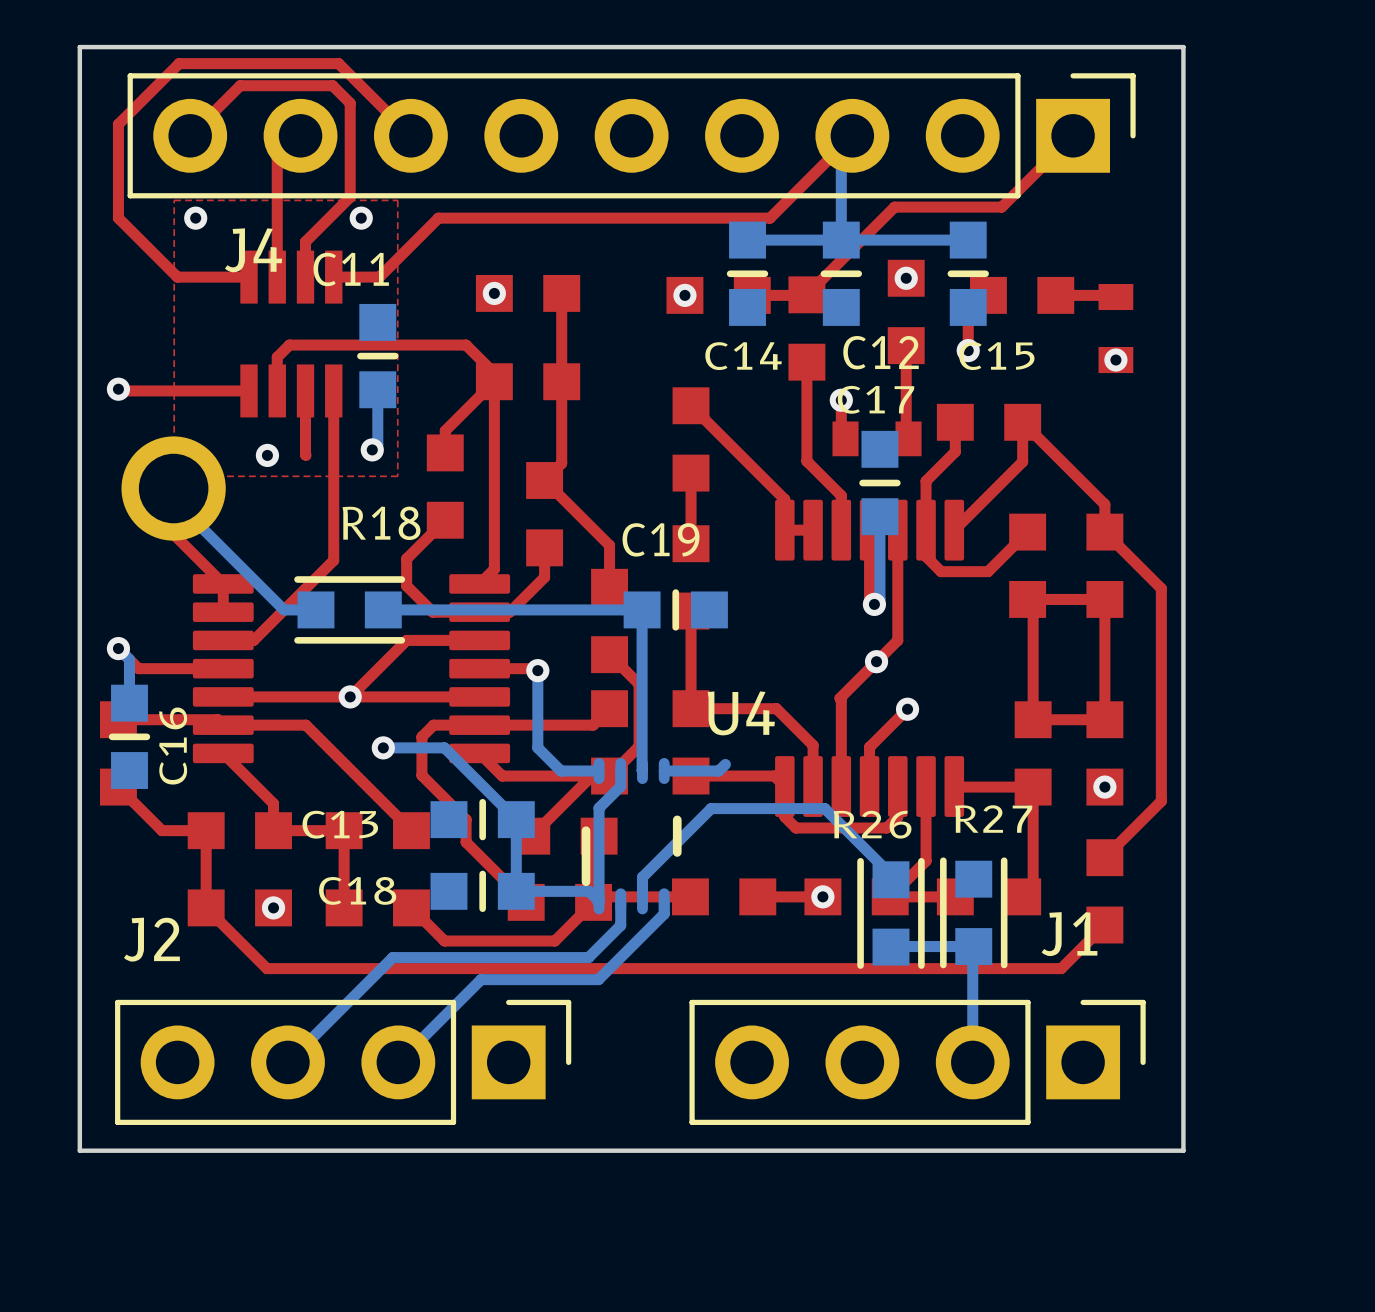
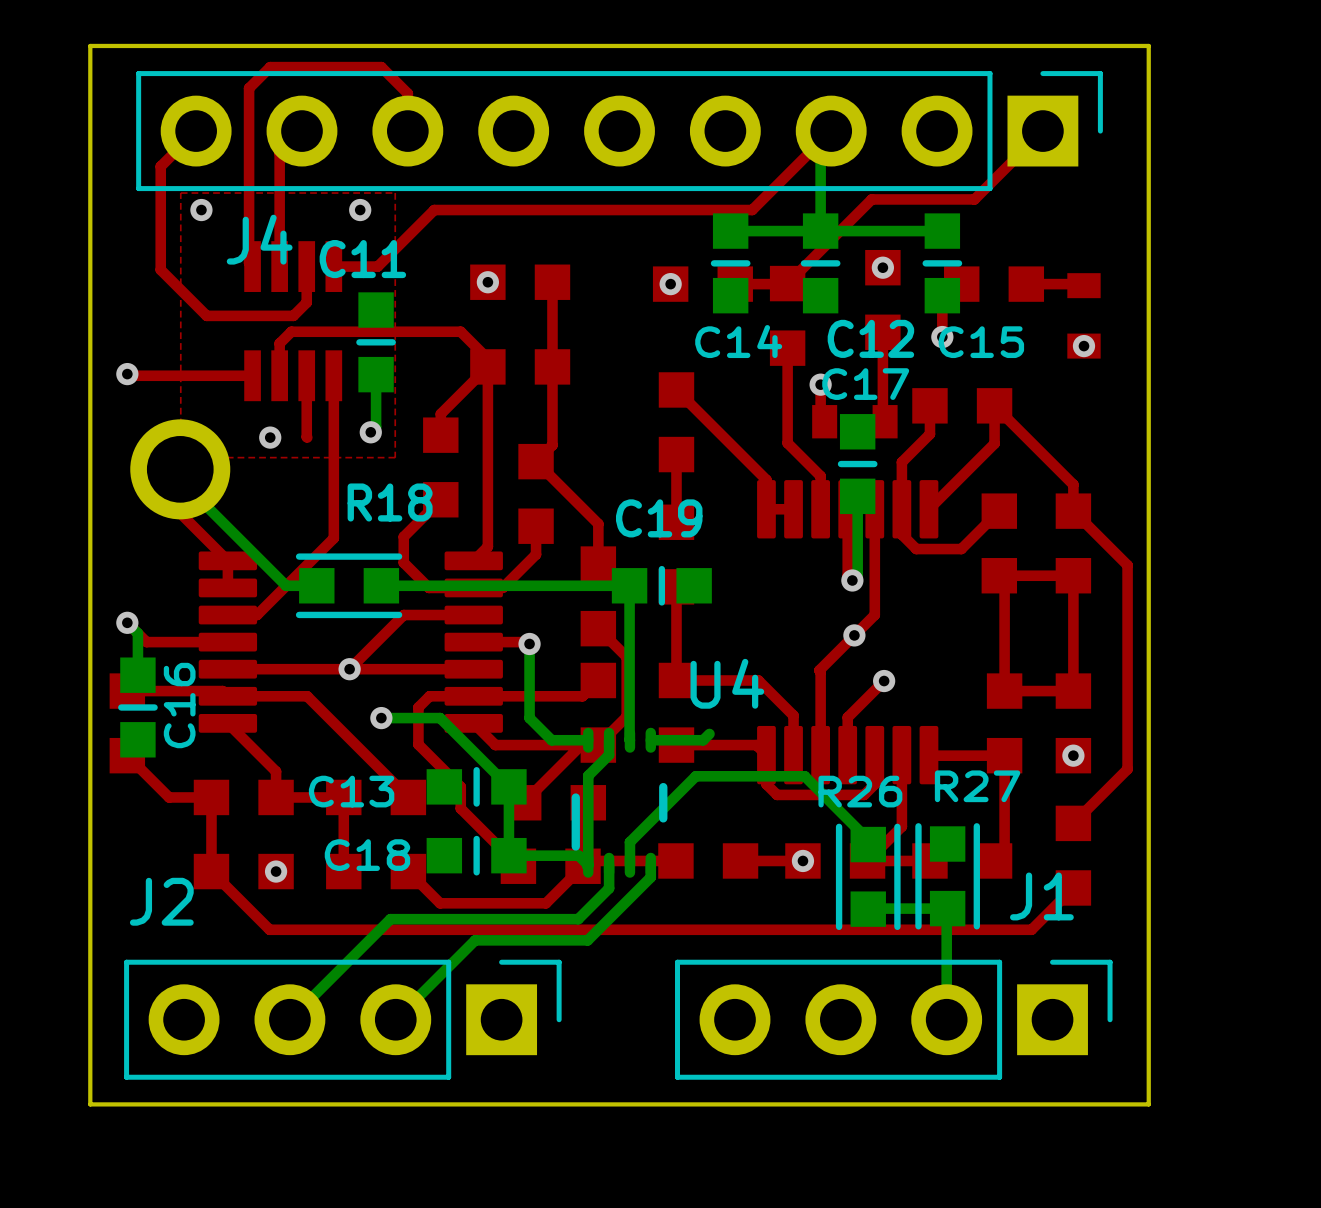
top track: (190, 135) (240, 85) (332, 85) (350, 103) (350, 197) (305, 241) (305, 277) -> (196, 131) (160, 166) (160, 269) (206, 315) (293, 315) (306, 302) (306, 266)
top track: (410, 135) (338, 63) (179, 63) (118, 124) (118, 218) (177, 277) (249, 277) -> (407, 131) (407, 93) (381, 67) (270, 67) (249, 88) (249, 263) (252, 266)

